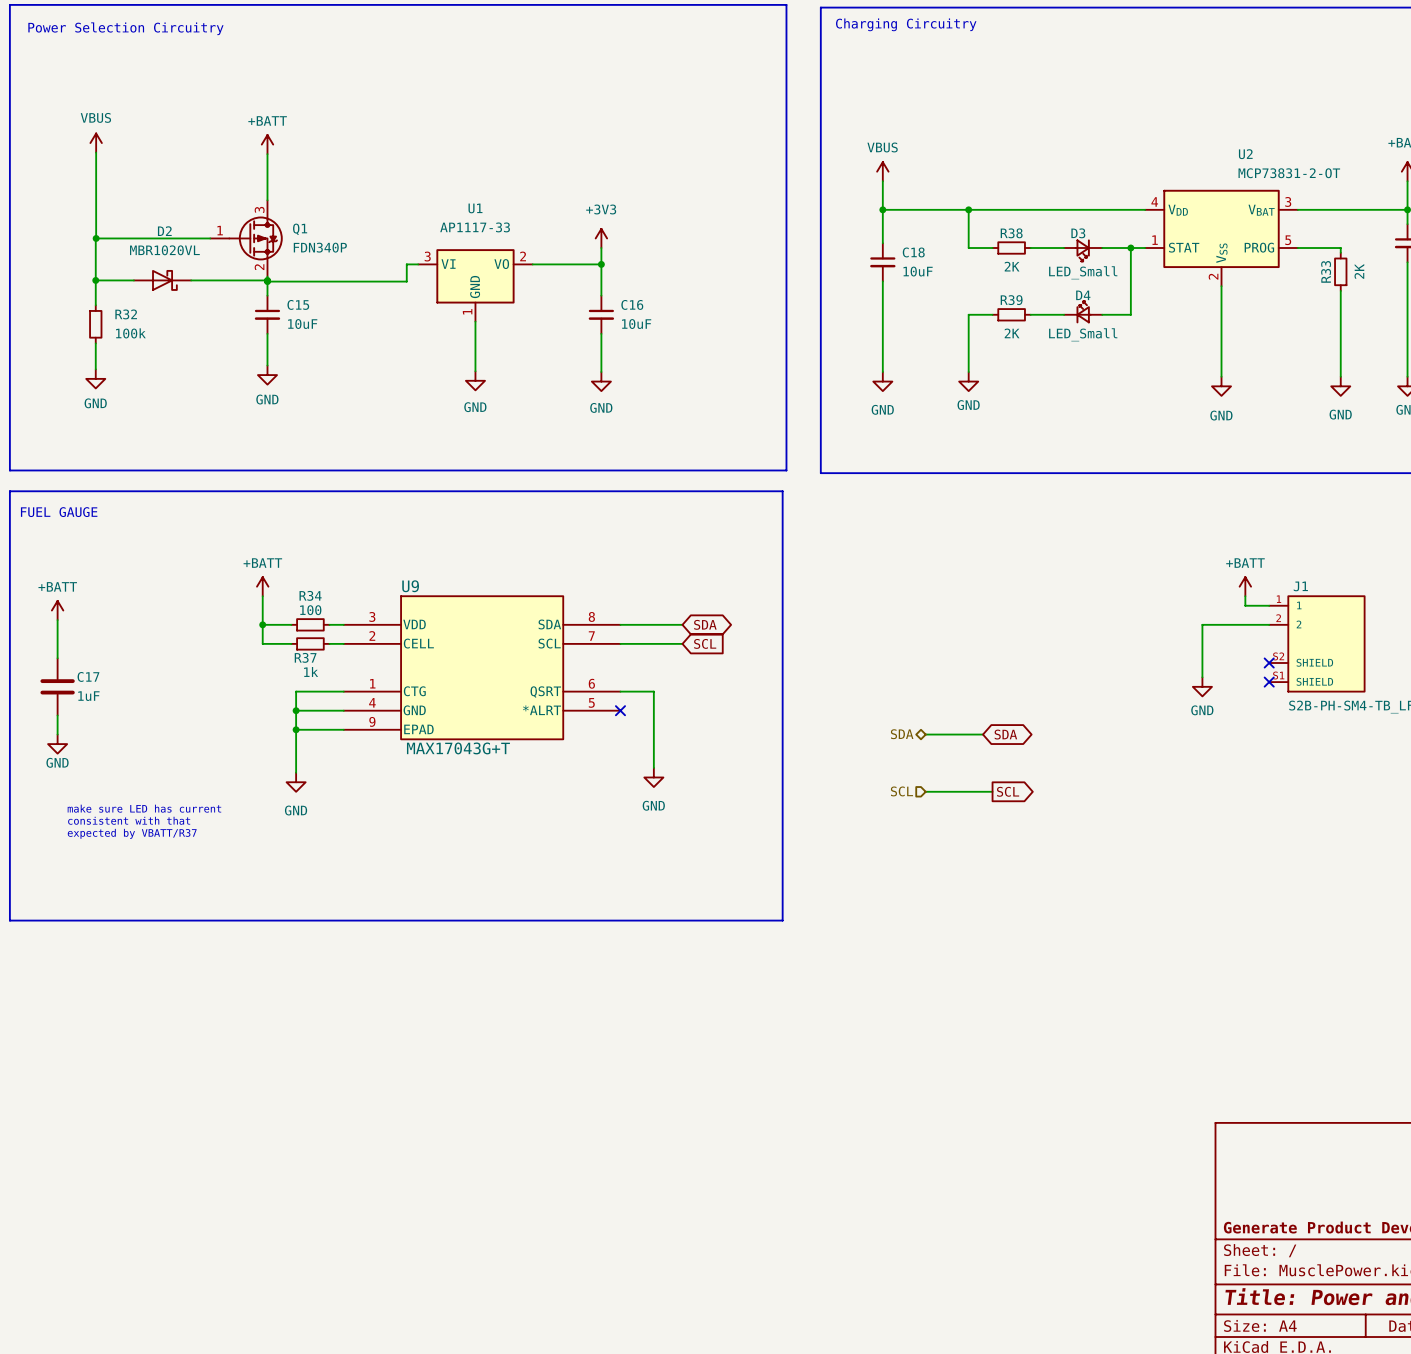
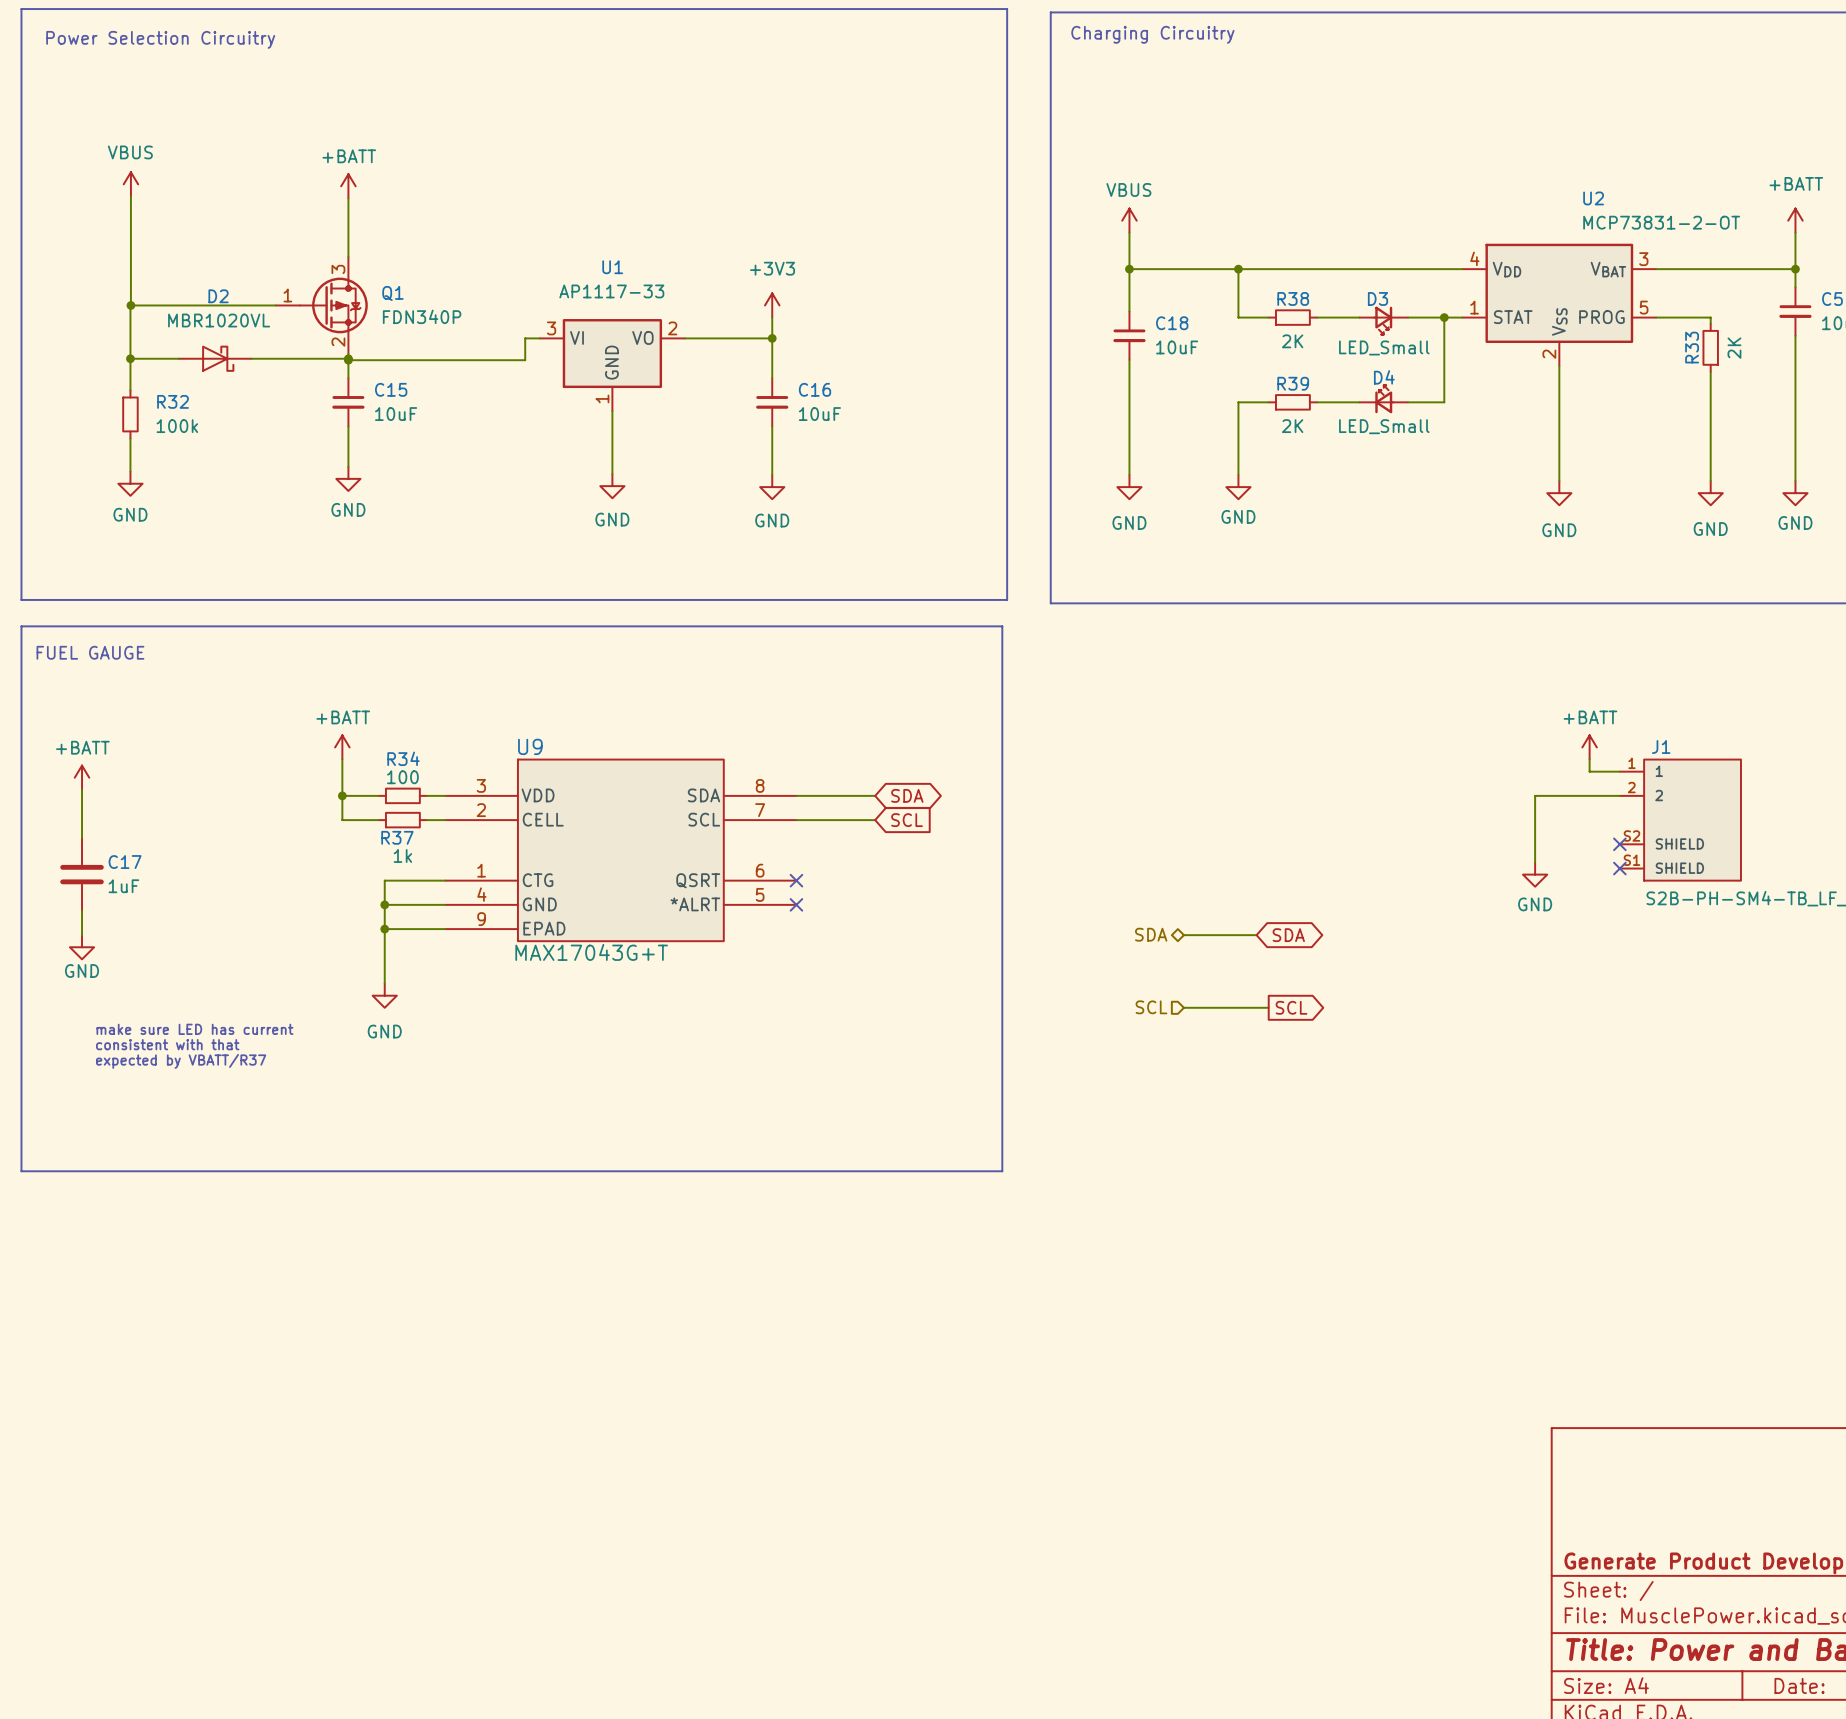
wire: (620, 691) (653, 691) (653, 767) -> none
no-connect mark: none -> (796, 880)
power symbol: GND (653, 777) -> none

